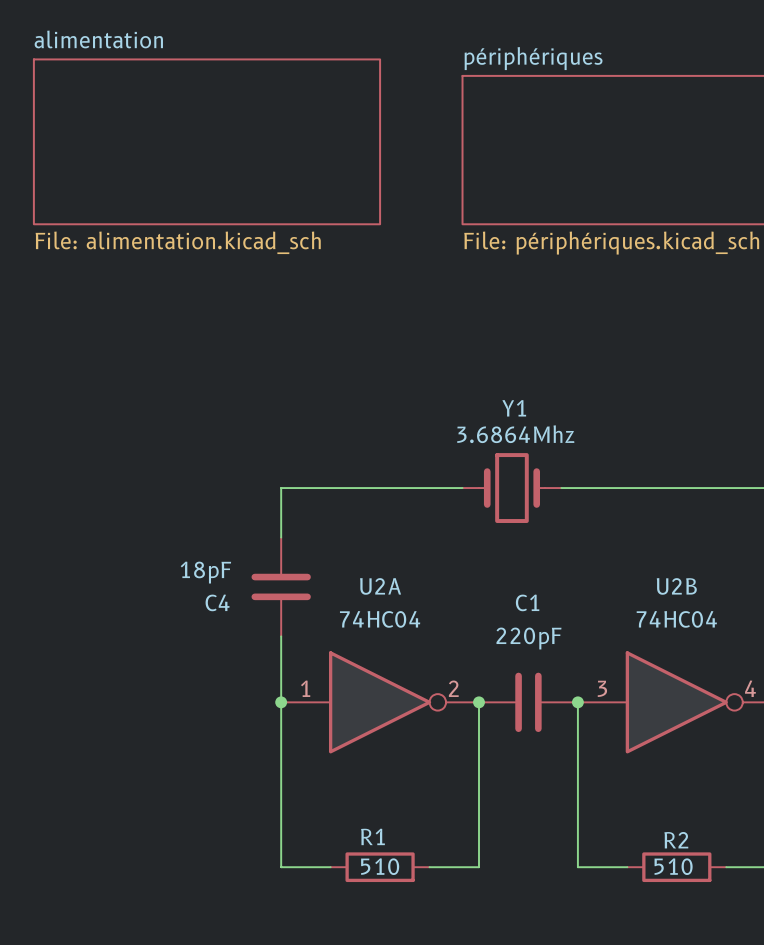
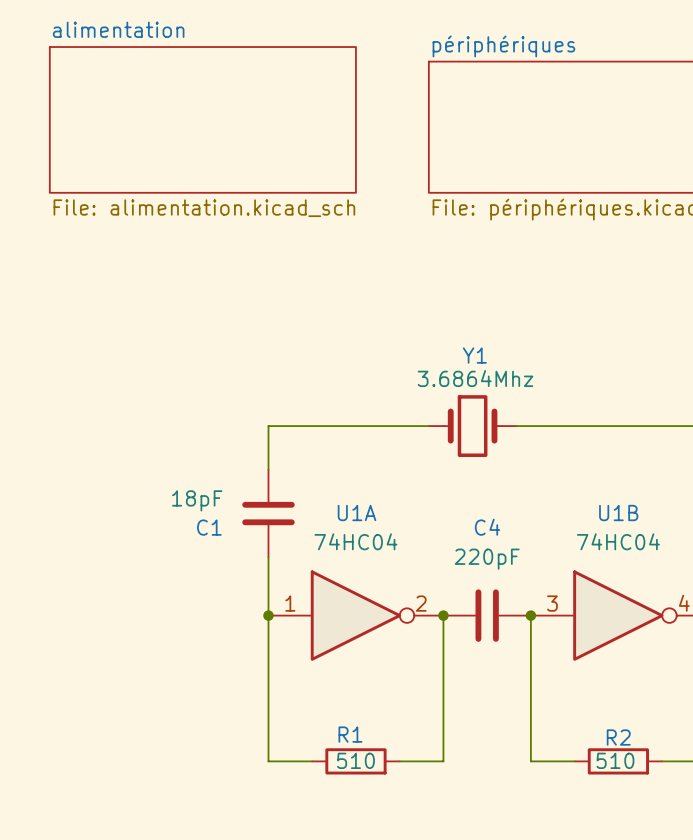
U2A name: U2A (380, 586) -> U1A (357, 513)
U2B name: U2B (676, 586) -> U1B (618, 513)
C4 name: C4 (217, 602) -> C1 (209, 527)
C1 name: C1 (527, 602) -> C4 (487, 527)

